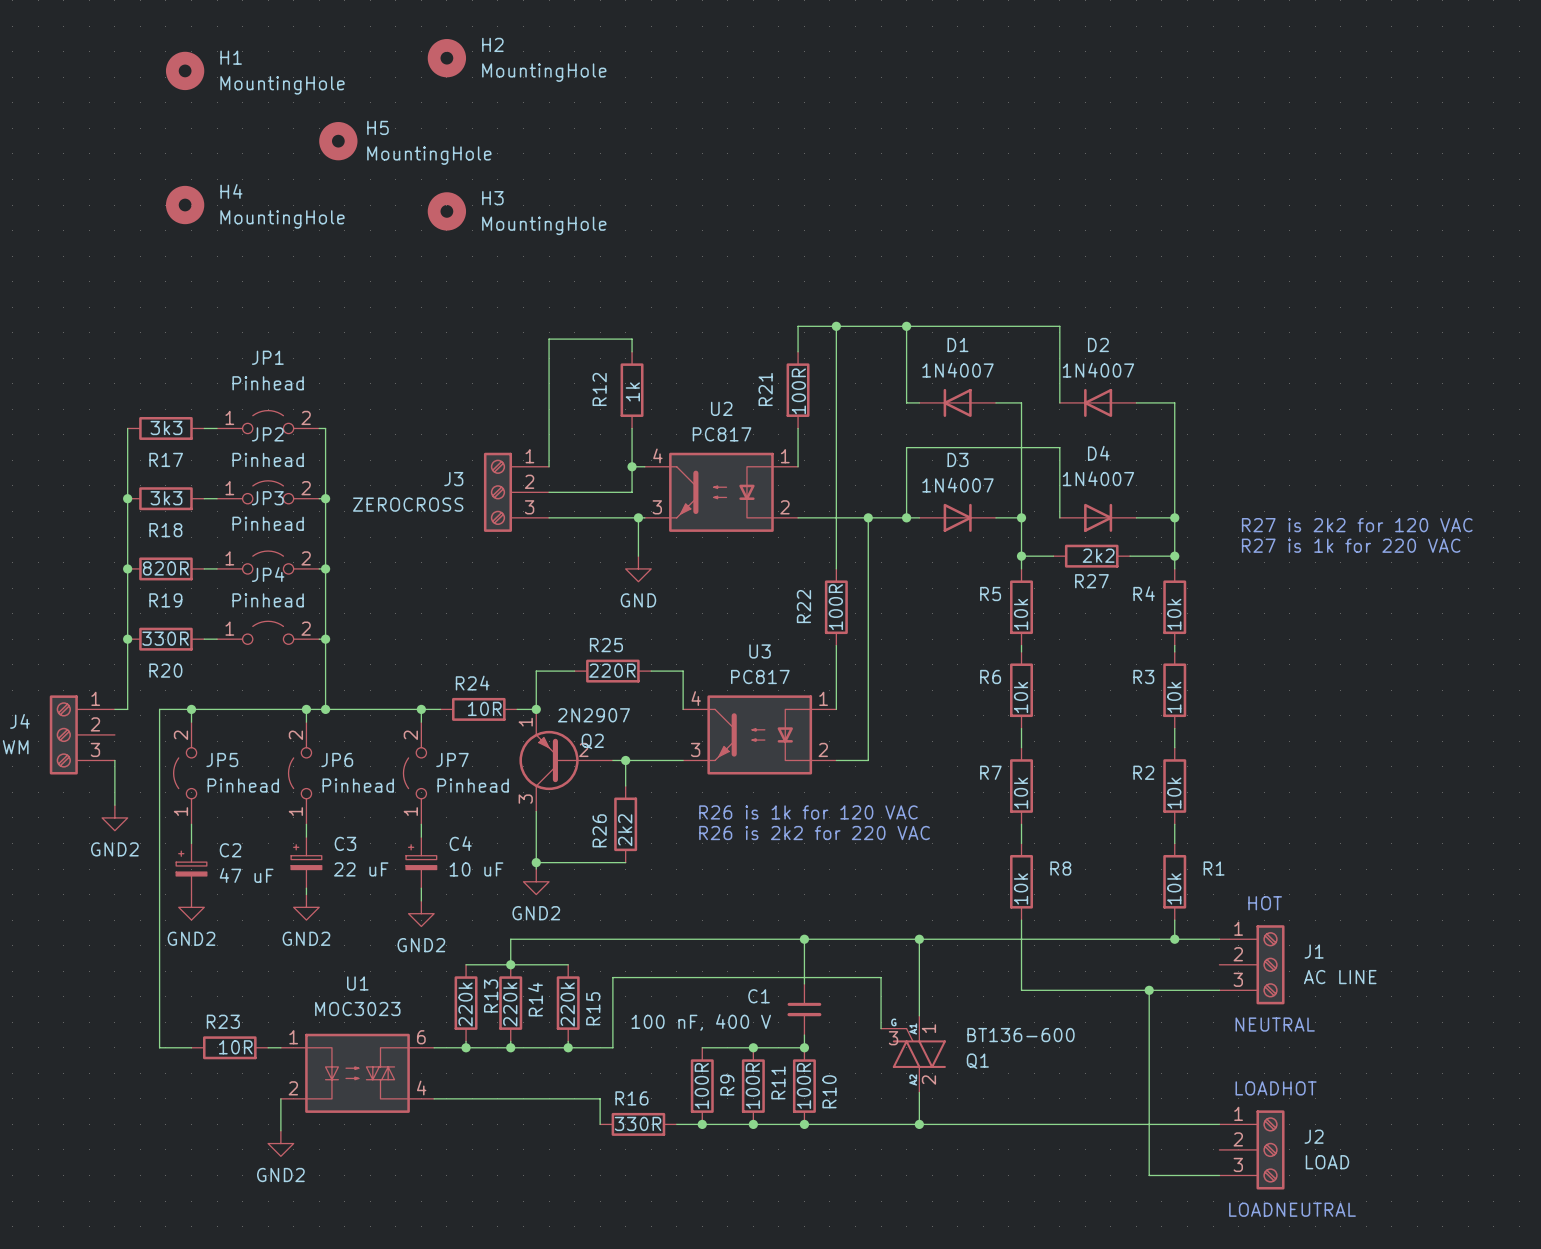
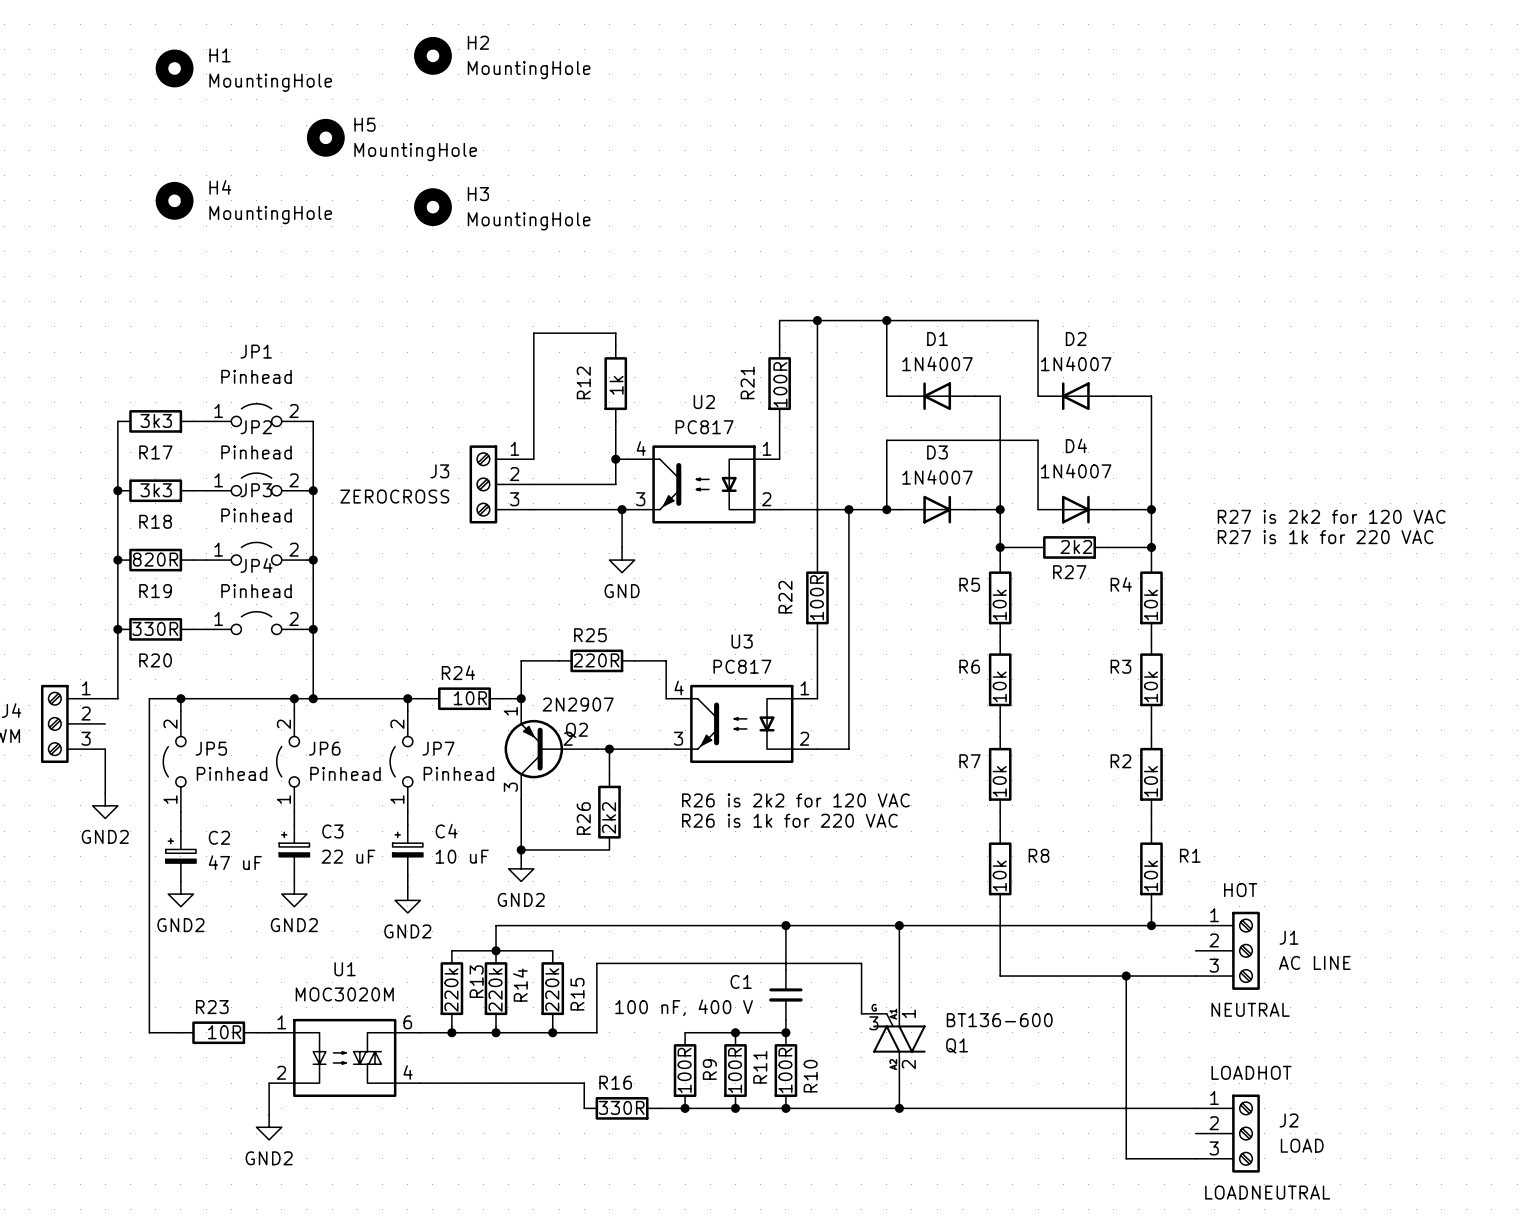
text: R26 is 1k for 120 VAC (808, 812) -> R26 is 2k2 for 120 VAC (795, 800)
text: R26 is 2k2 for 220 VAC (814, 833) -> R26 is 1k for 220 VAC (789, 820)
U1 value: MOC3023 (357, 1009) -> MOC3020M (344, 994)

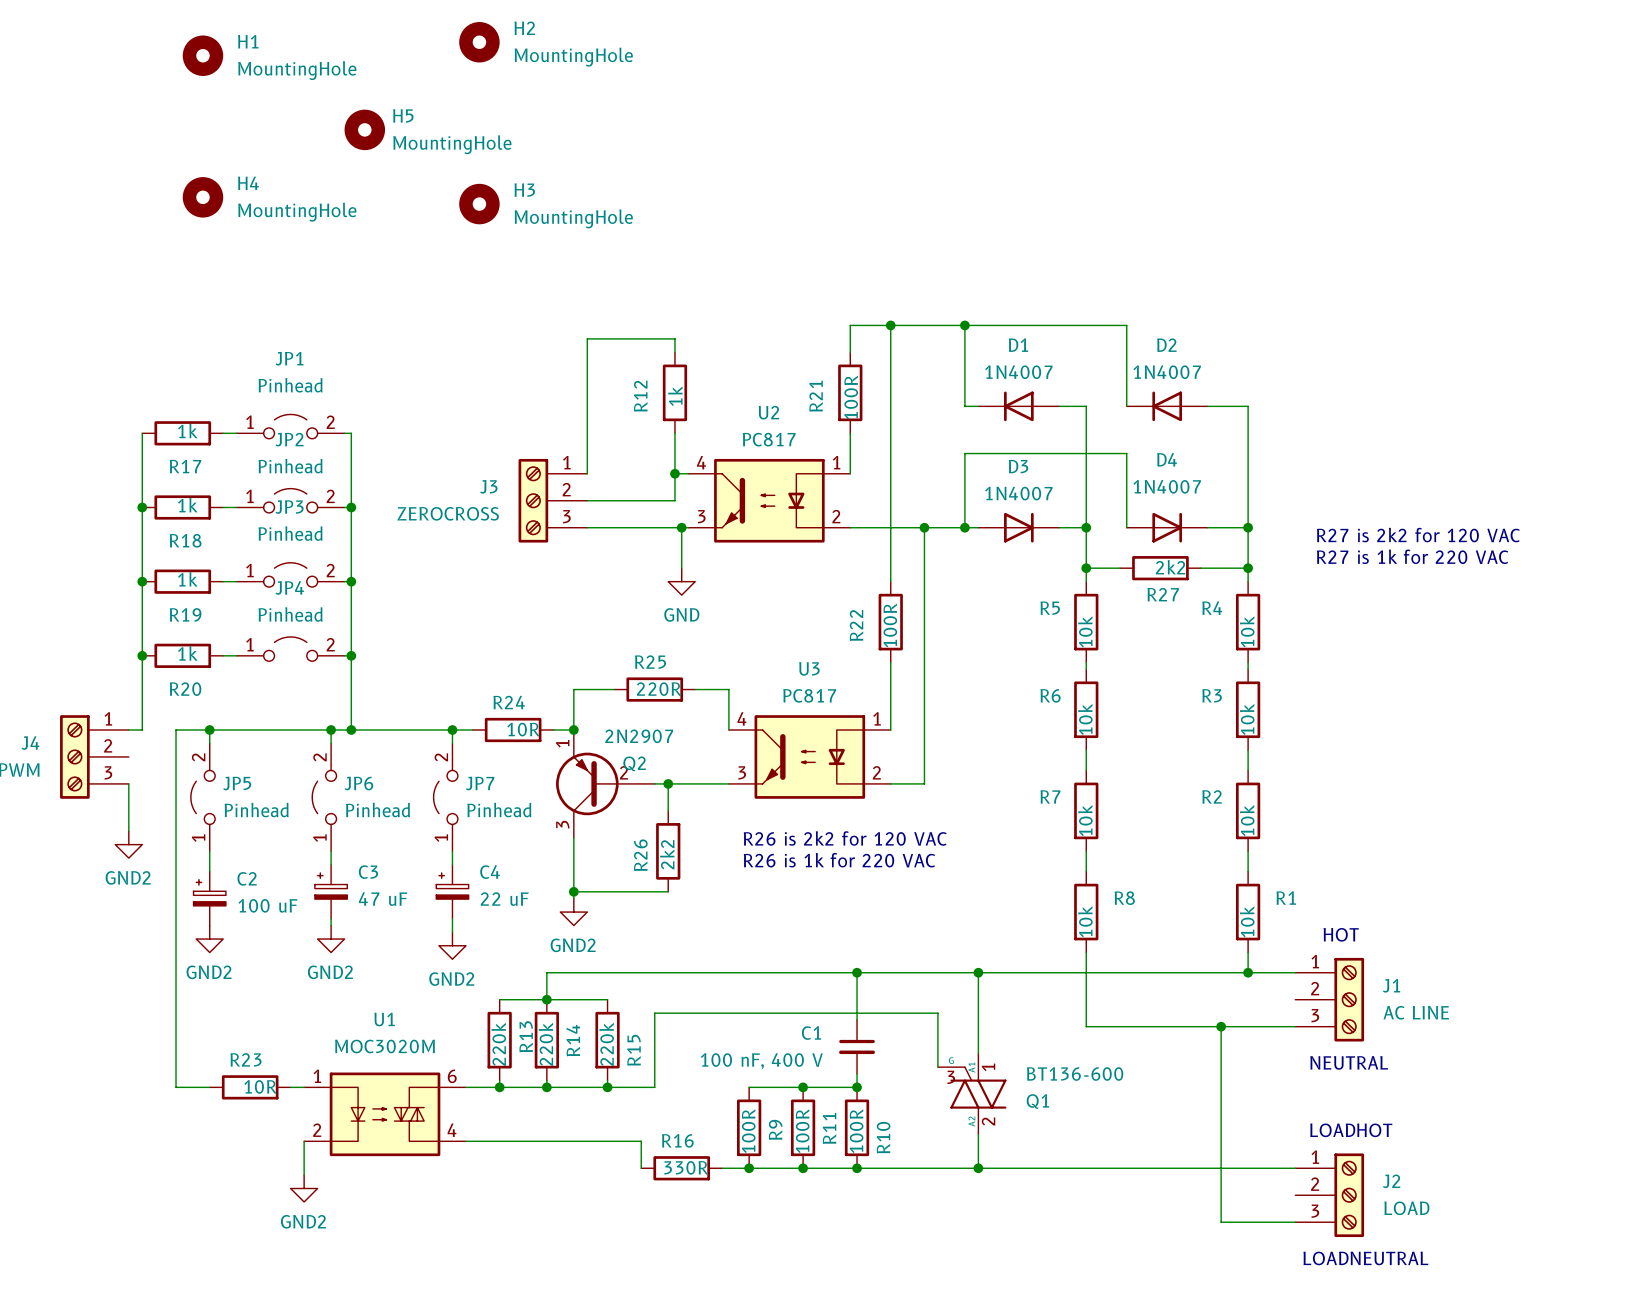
R17 value: 3k3 (156, 420) -> 1k (187, 431)
R18 value: 3k3 (156, 490) -> 1k (187, 505)
R19 value: 820R (155, 559) -> 1k (187, 579)
R20 value: 330R (155, 628) -> 1k (187, 653)
C3 value: 22 uF (348, 856) -> 47 uF (383, 899)
C4 value: 10 uF (462, 856) -> 22 uF (504, 899)
C2 value: 47 uF (235, 862) -> 100 uF (267, 905)

